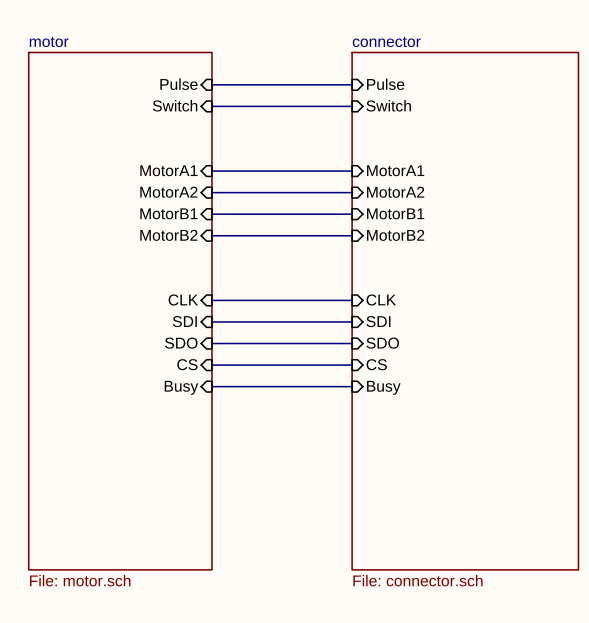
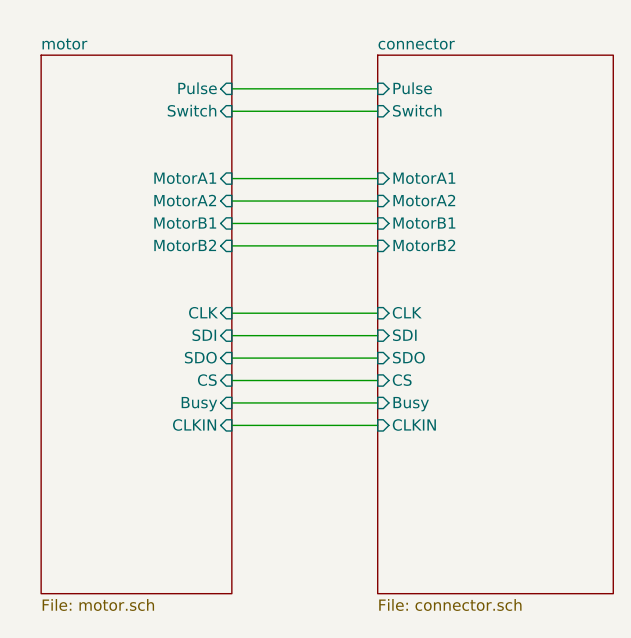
sheet pin: none -> CLKIN (194, 424)
sheet pin: none -> CLKIN (414, 424)
wire: none -> (231, 425) (377, 425)

